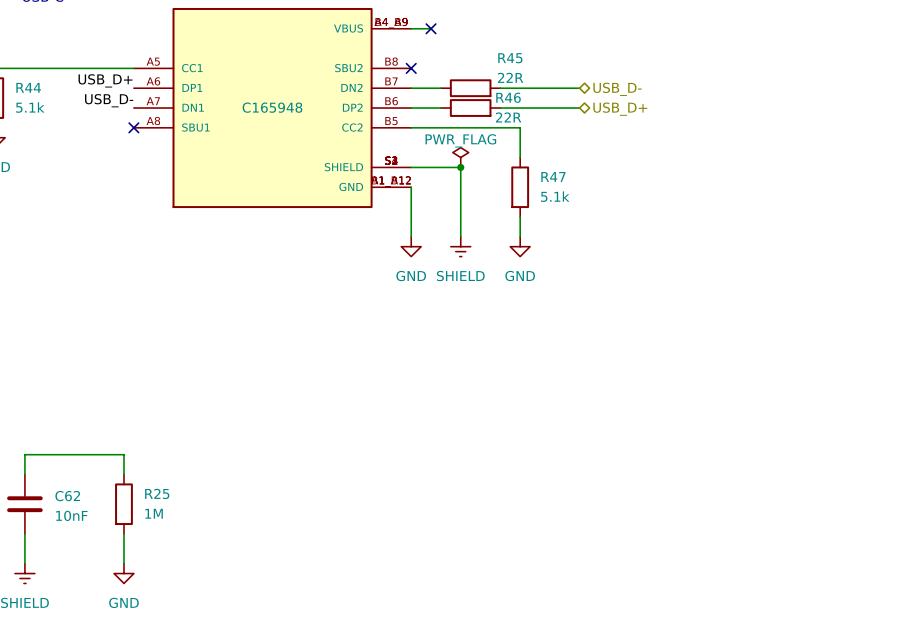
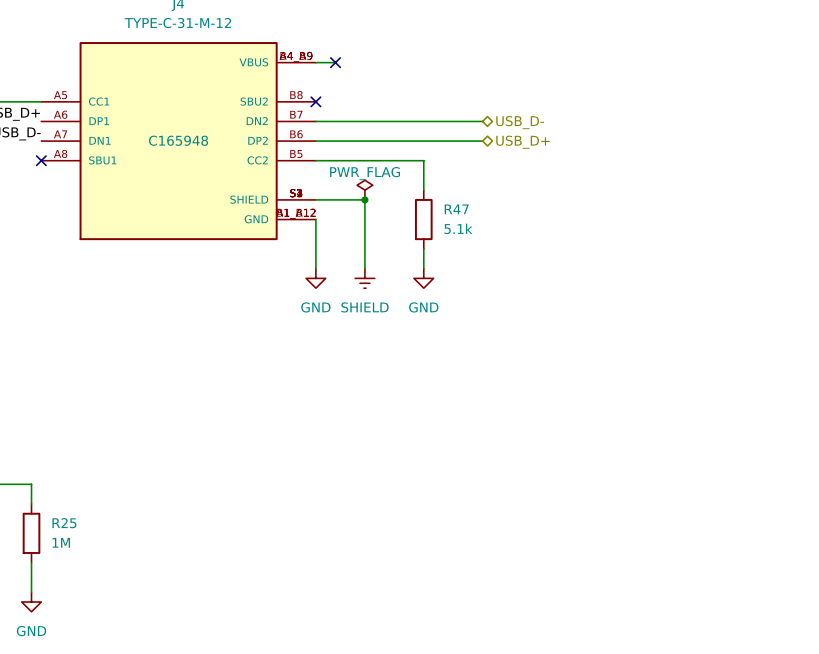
wire: none -> (345, 121) (404, 121)
R45: 22R (470, 88) -> none
wire: none -> (345, 141) (404, 141)
R46: 22R (470, 108) -> none

